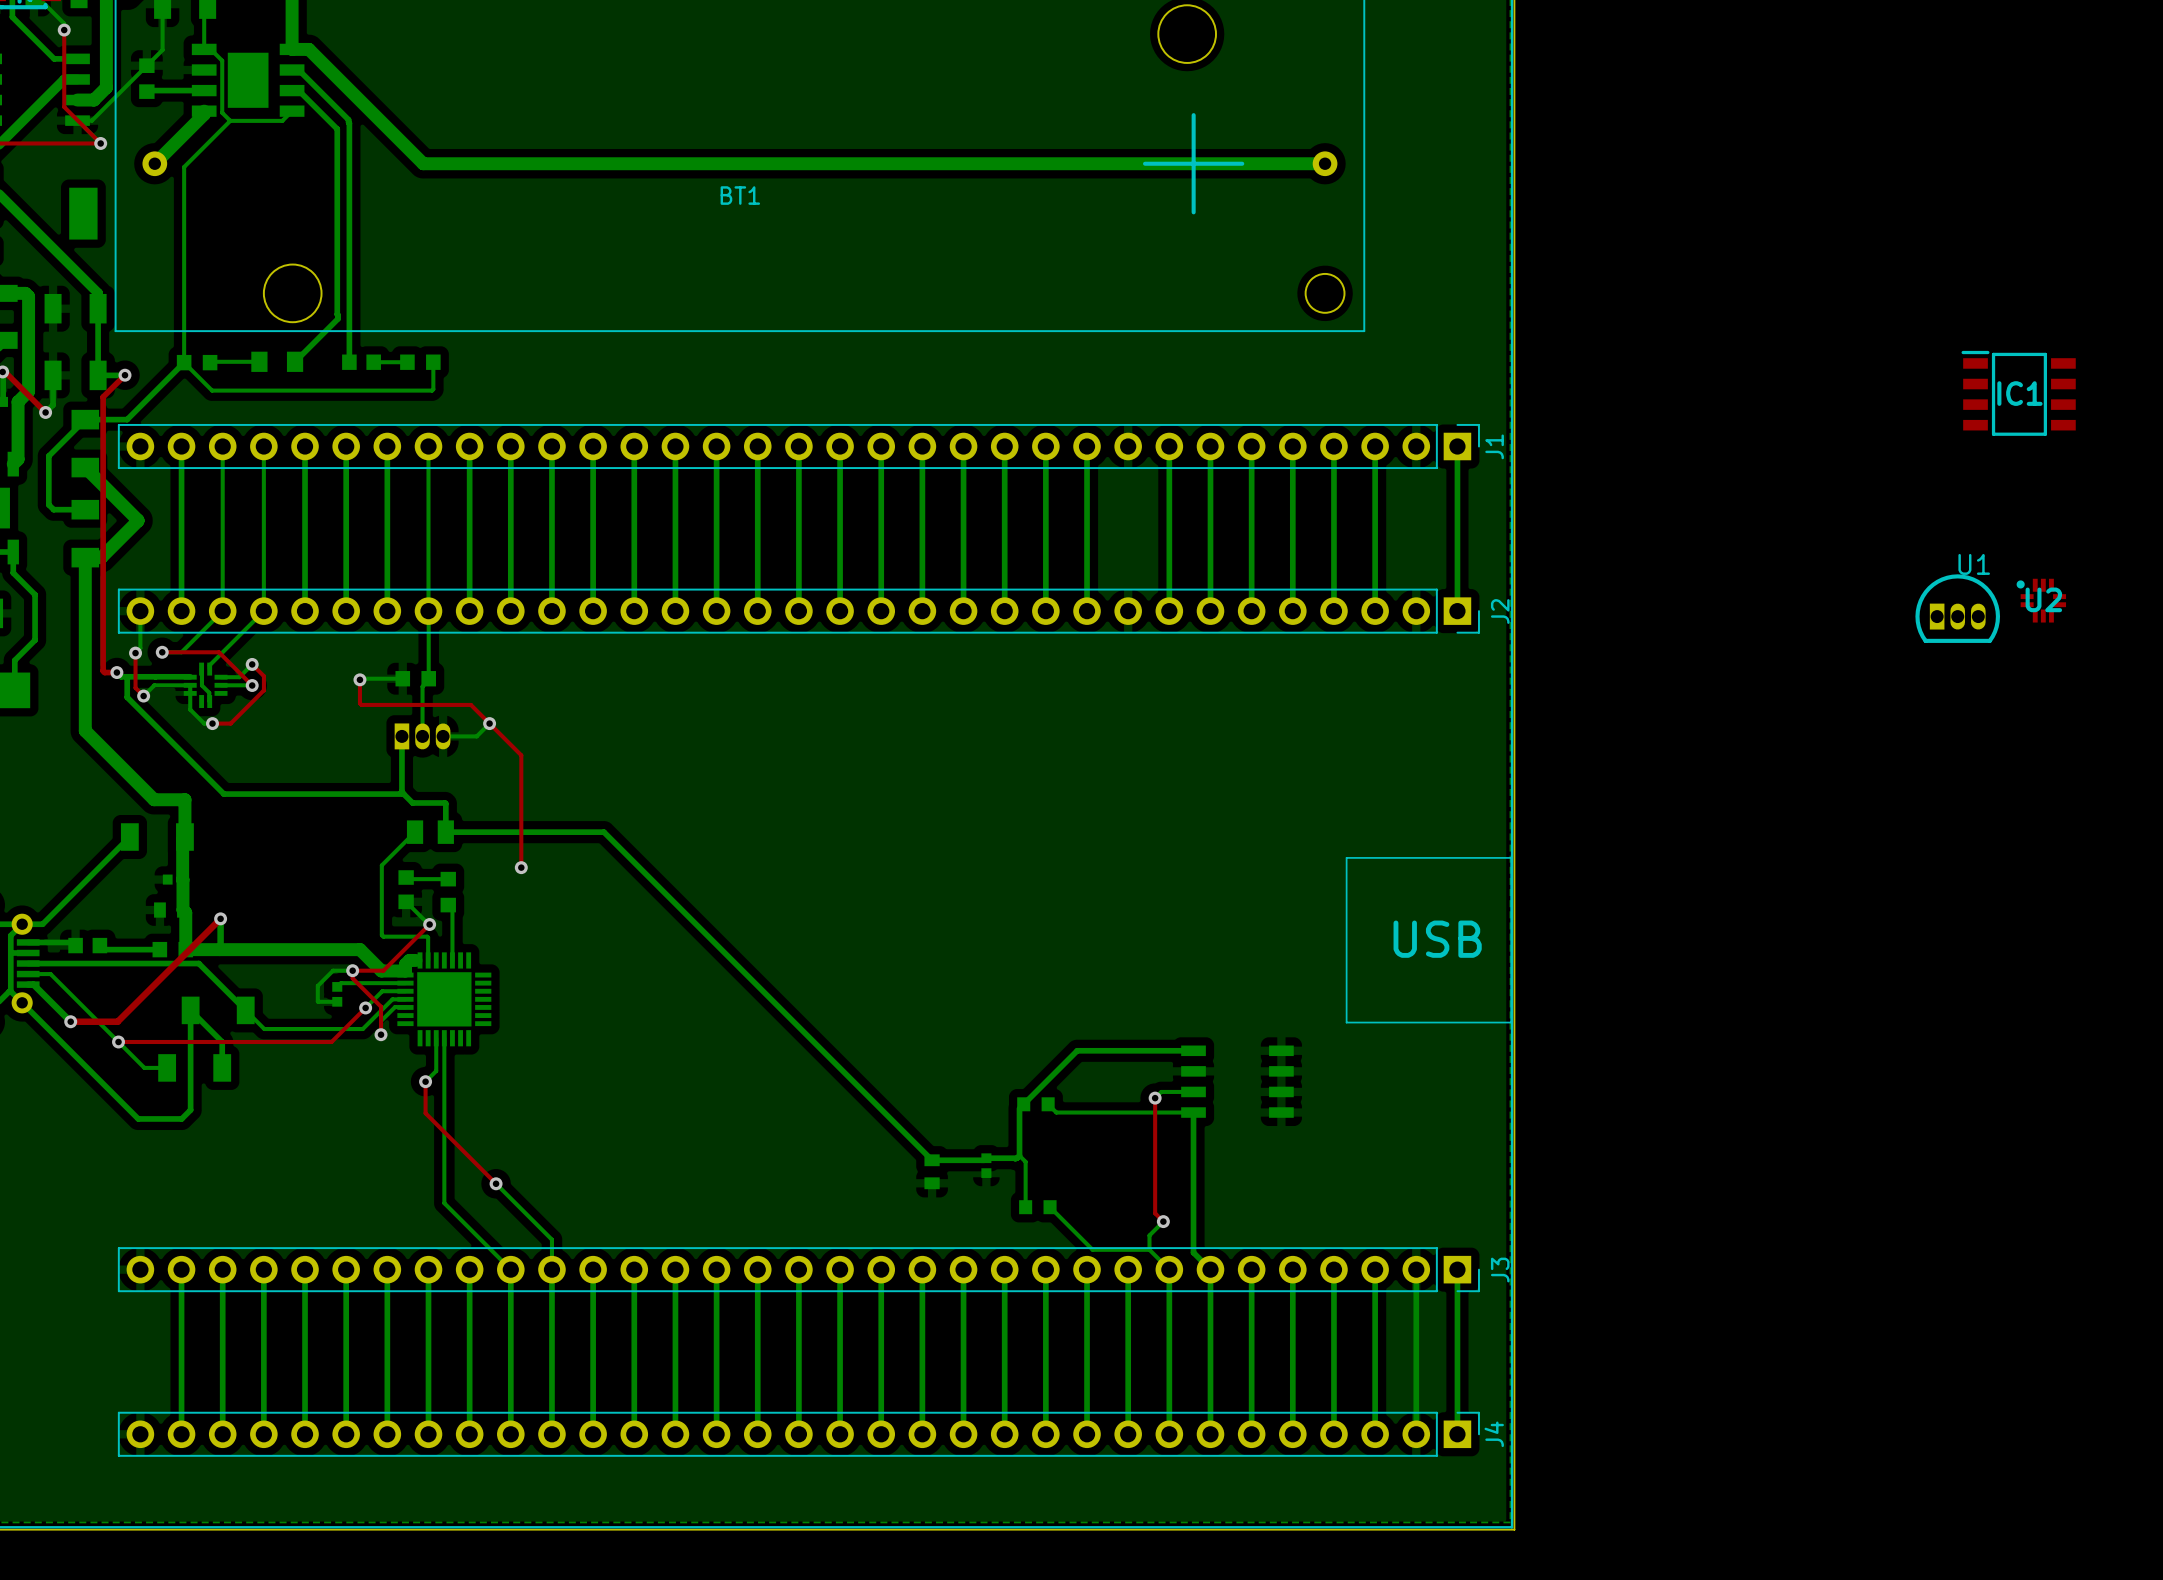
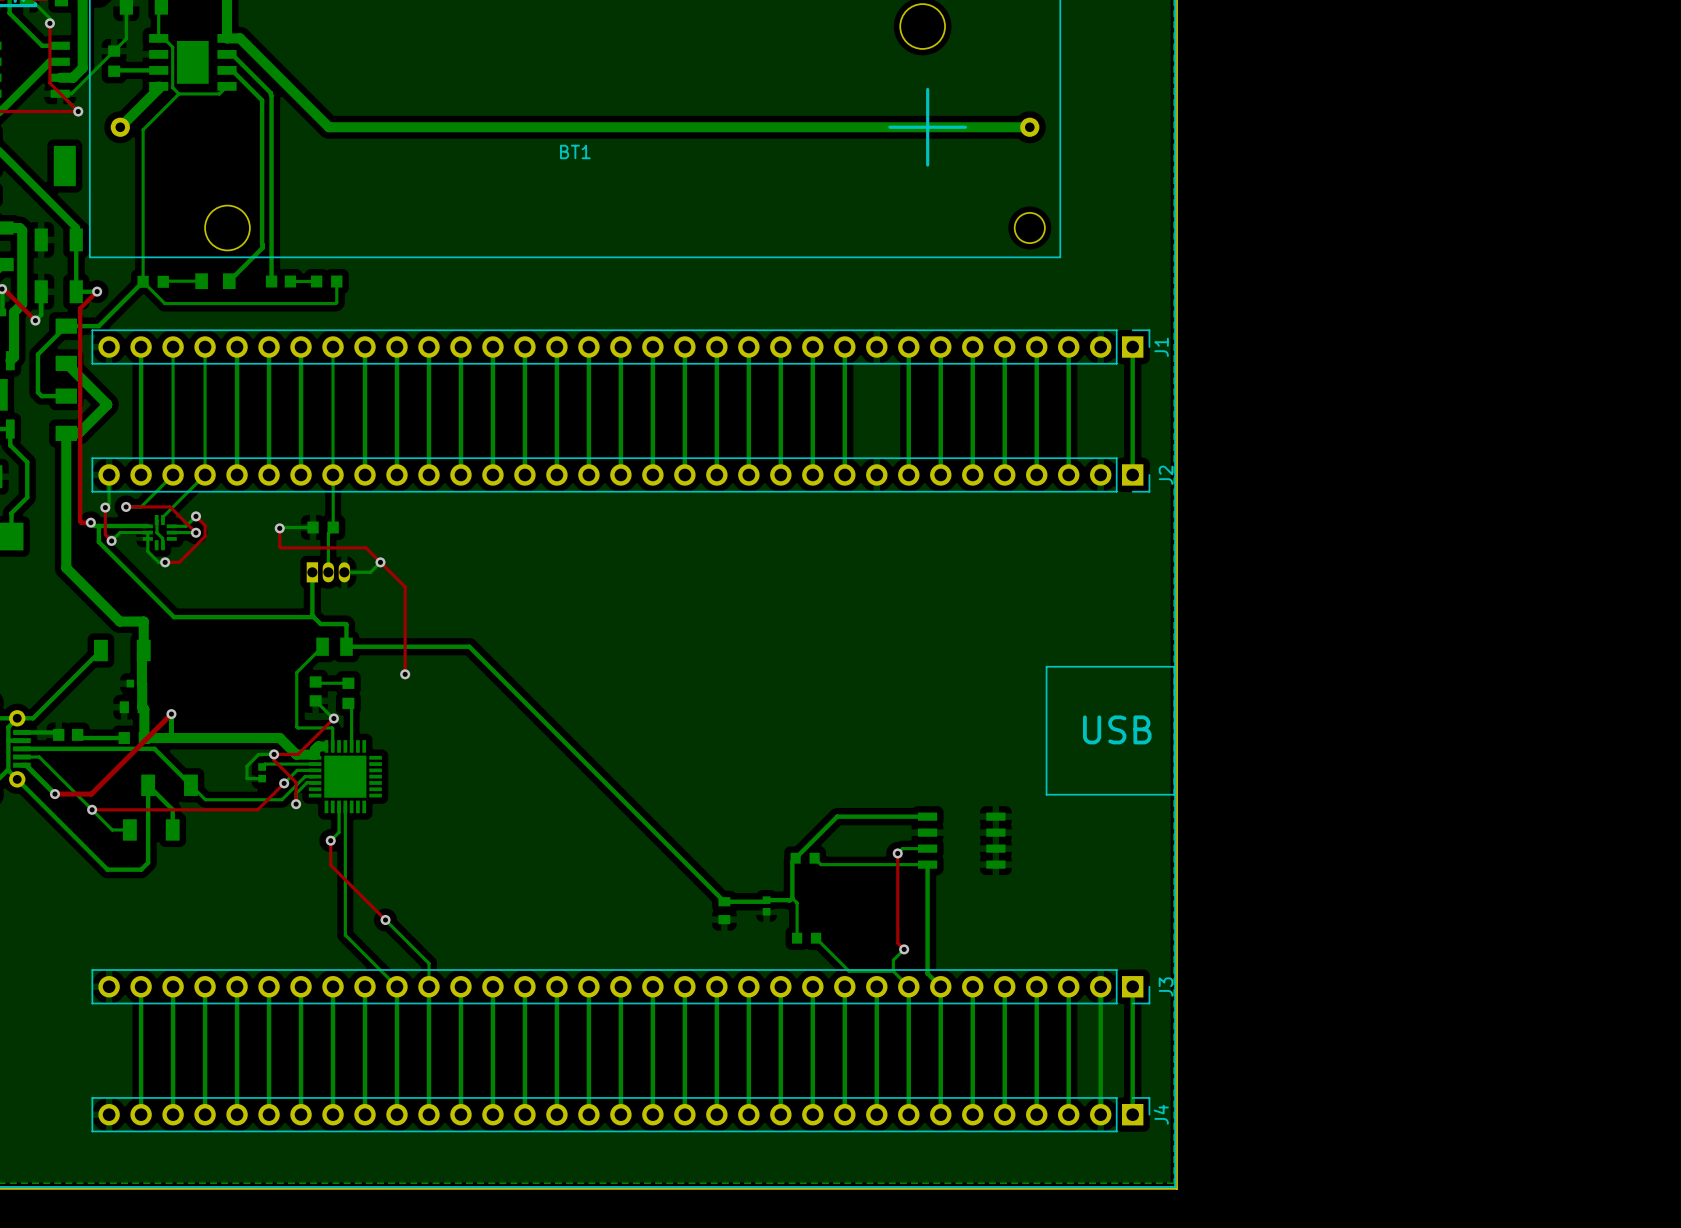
IC1: (2018, 393) -> none
U2: (2041, 600) -> none
U1: (1957, 608) -> none

